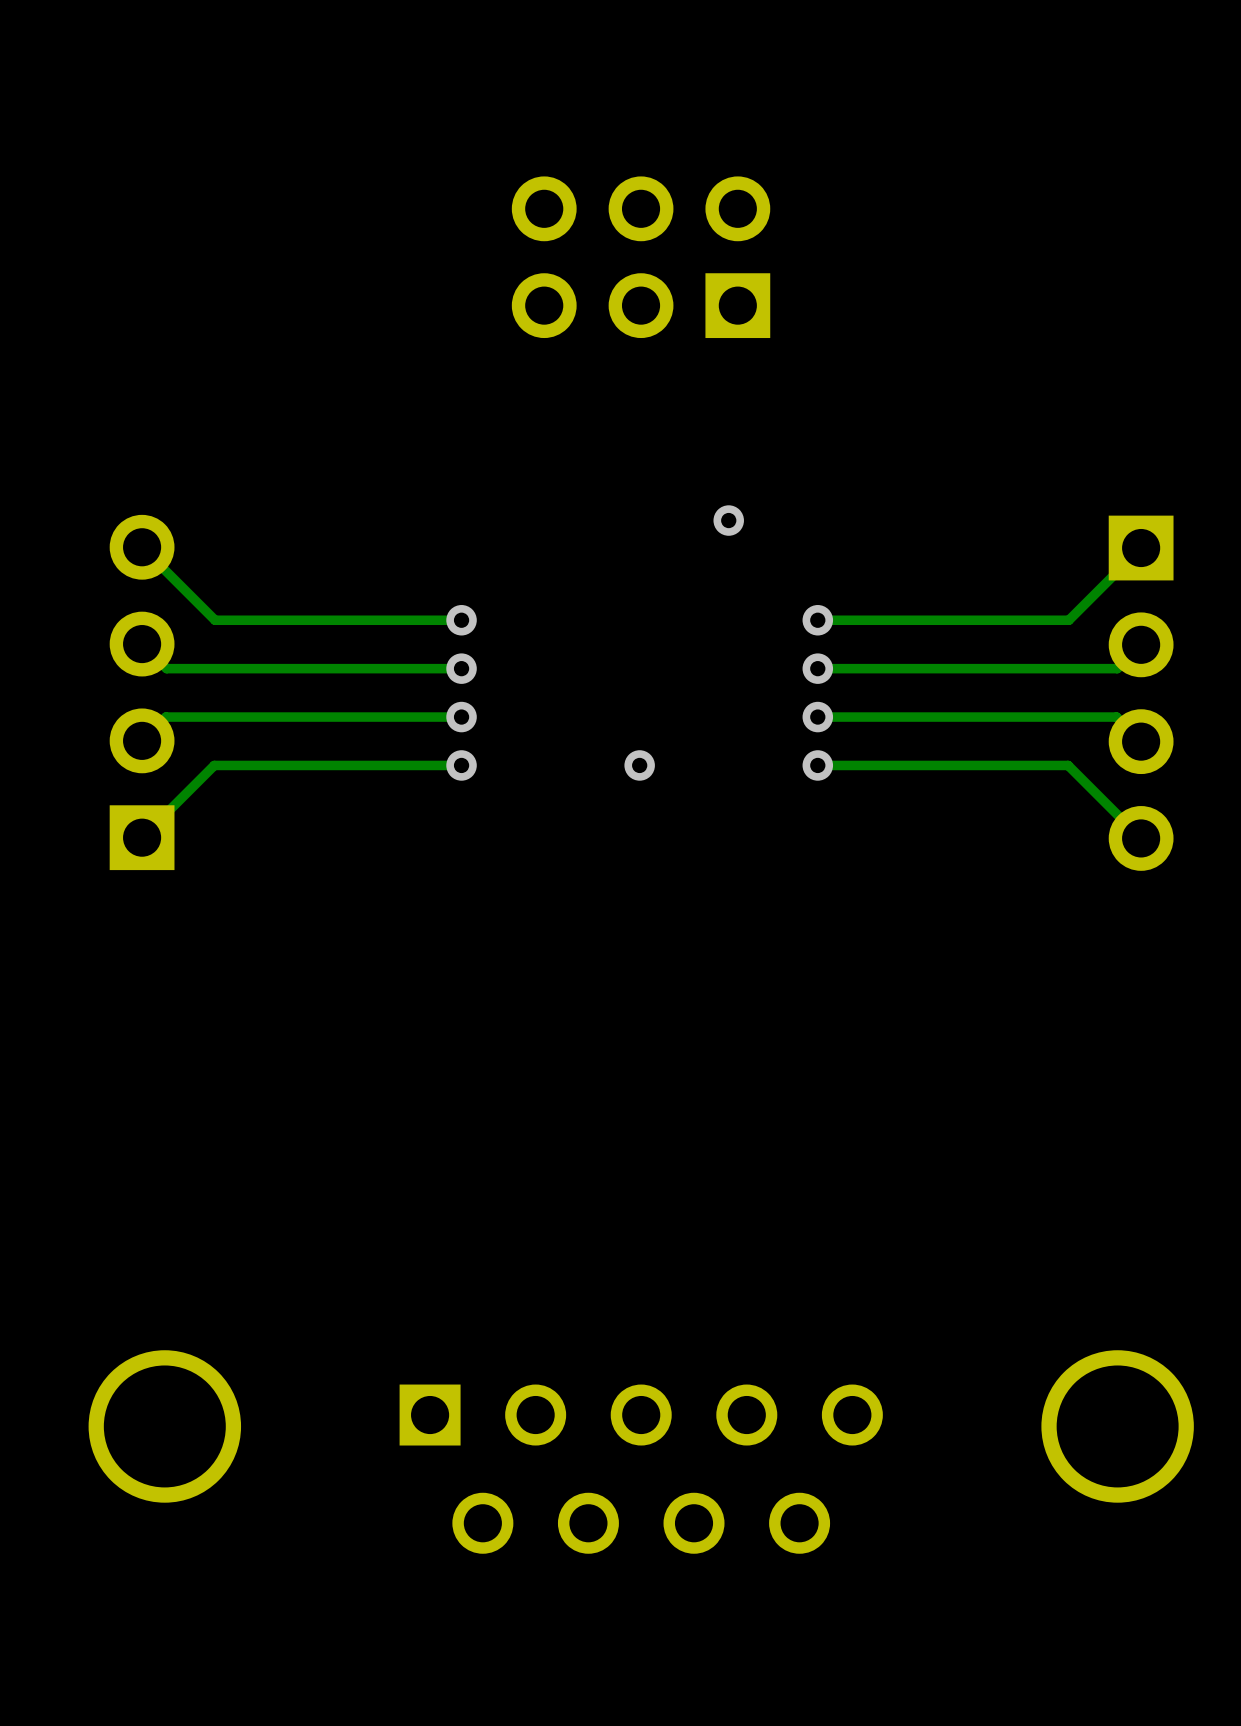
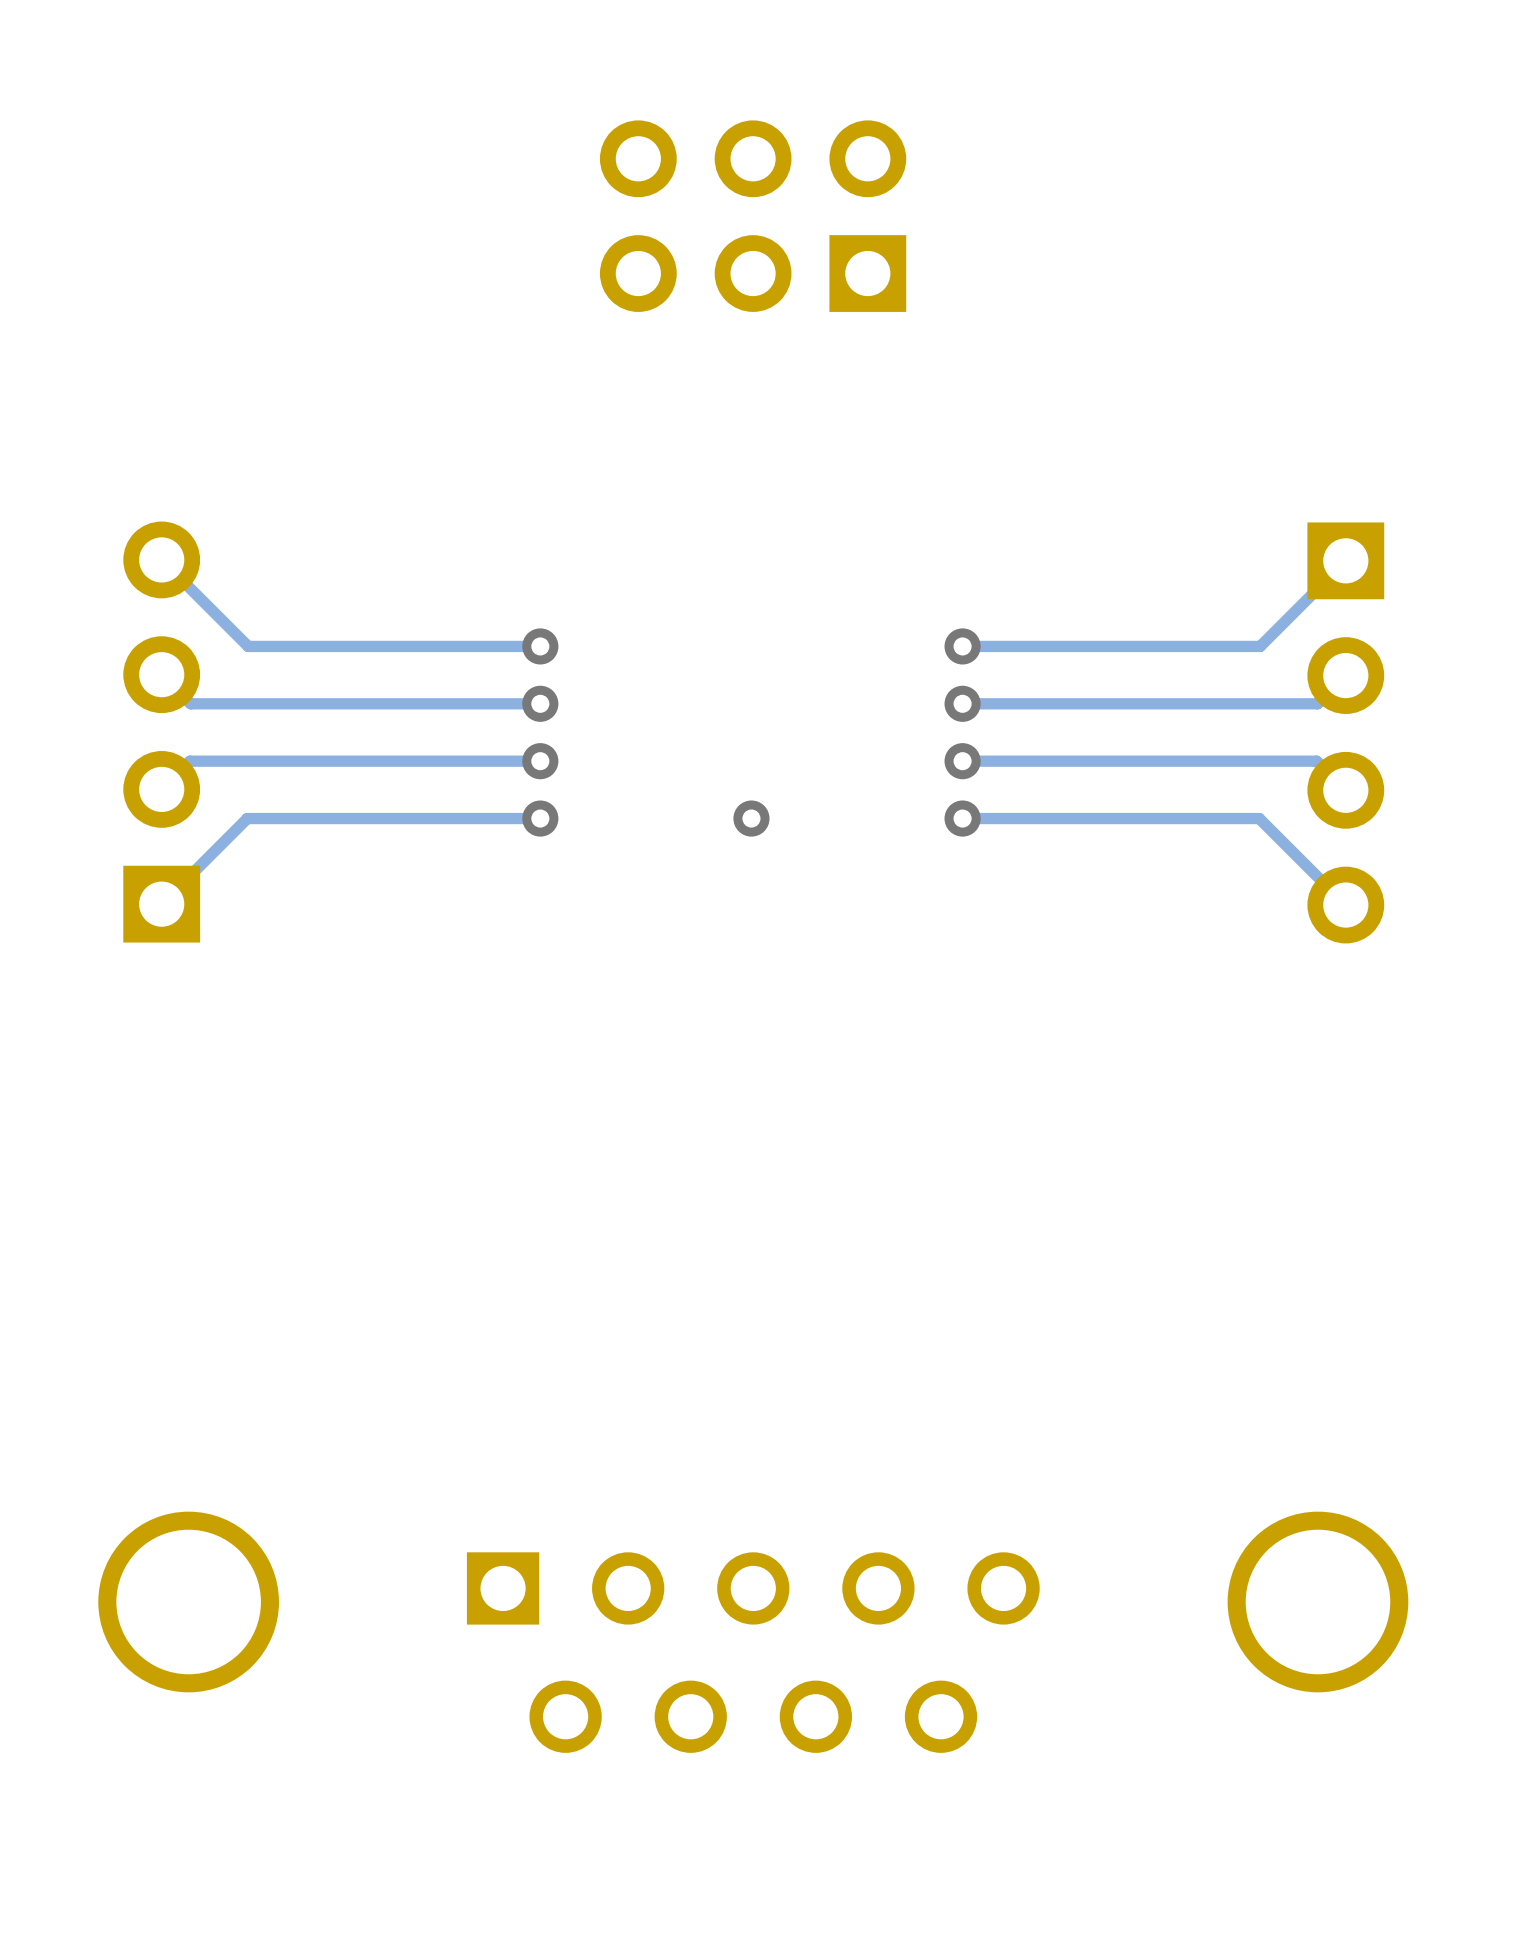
via: (728, 520) -> none

